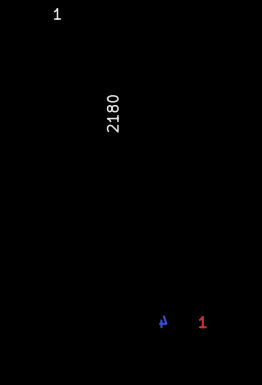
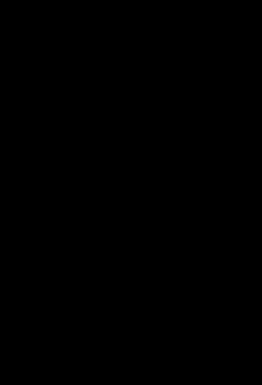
text: 1 (57, 13) -> none
text: 2180 (112, 113) -> none
drawing: [158, 315, 207, 329] -> none

